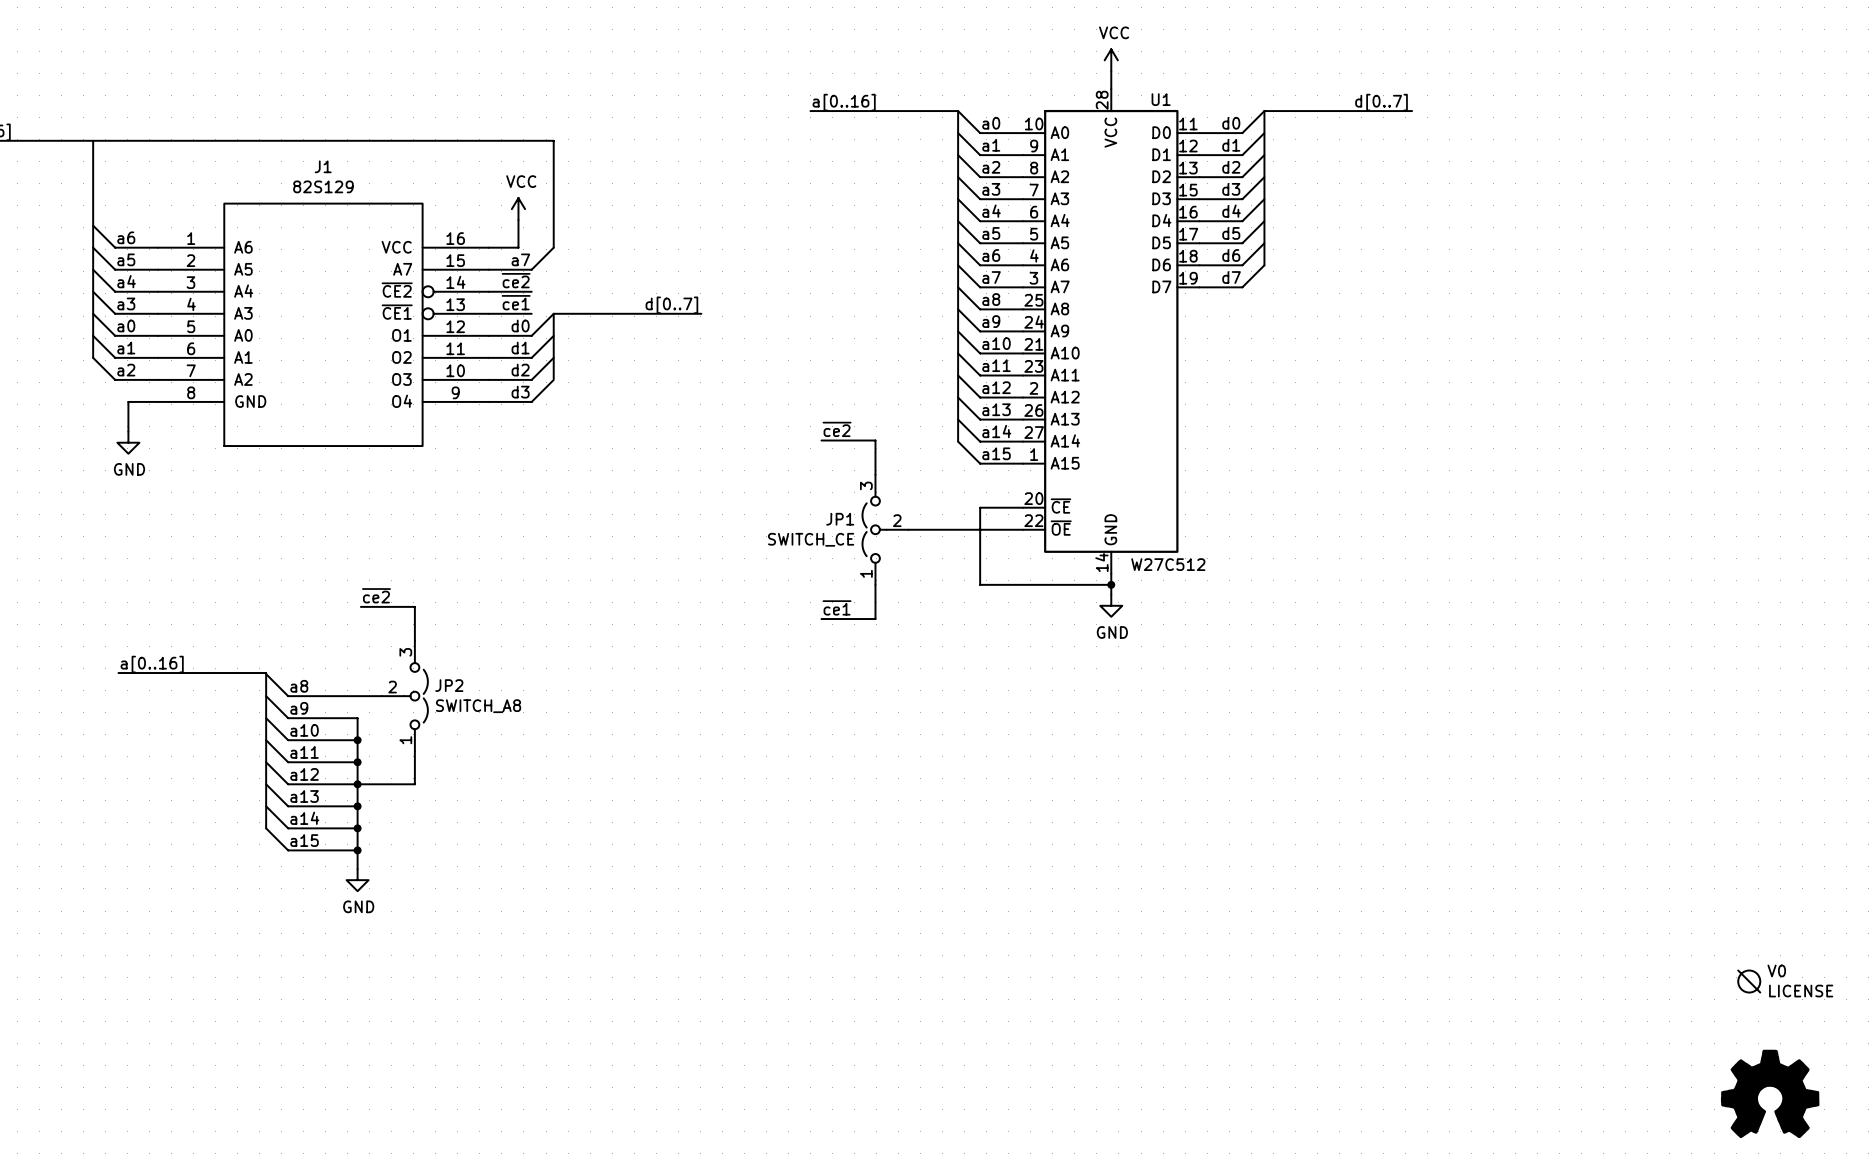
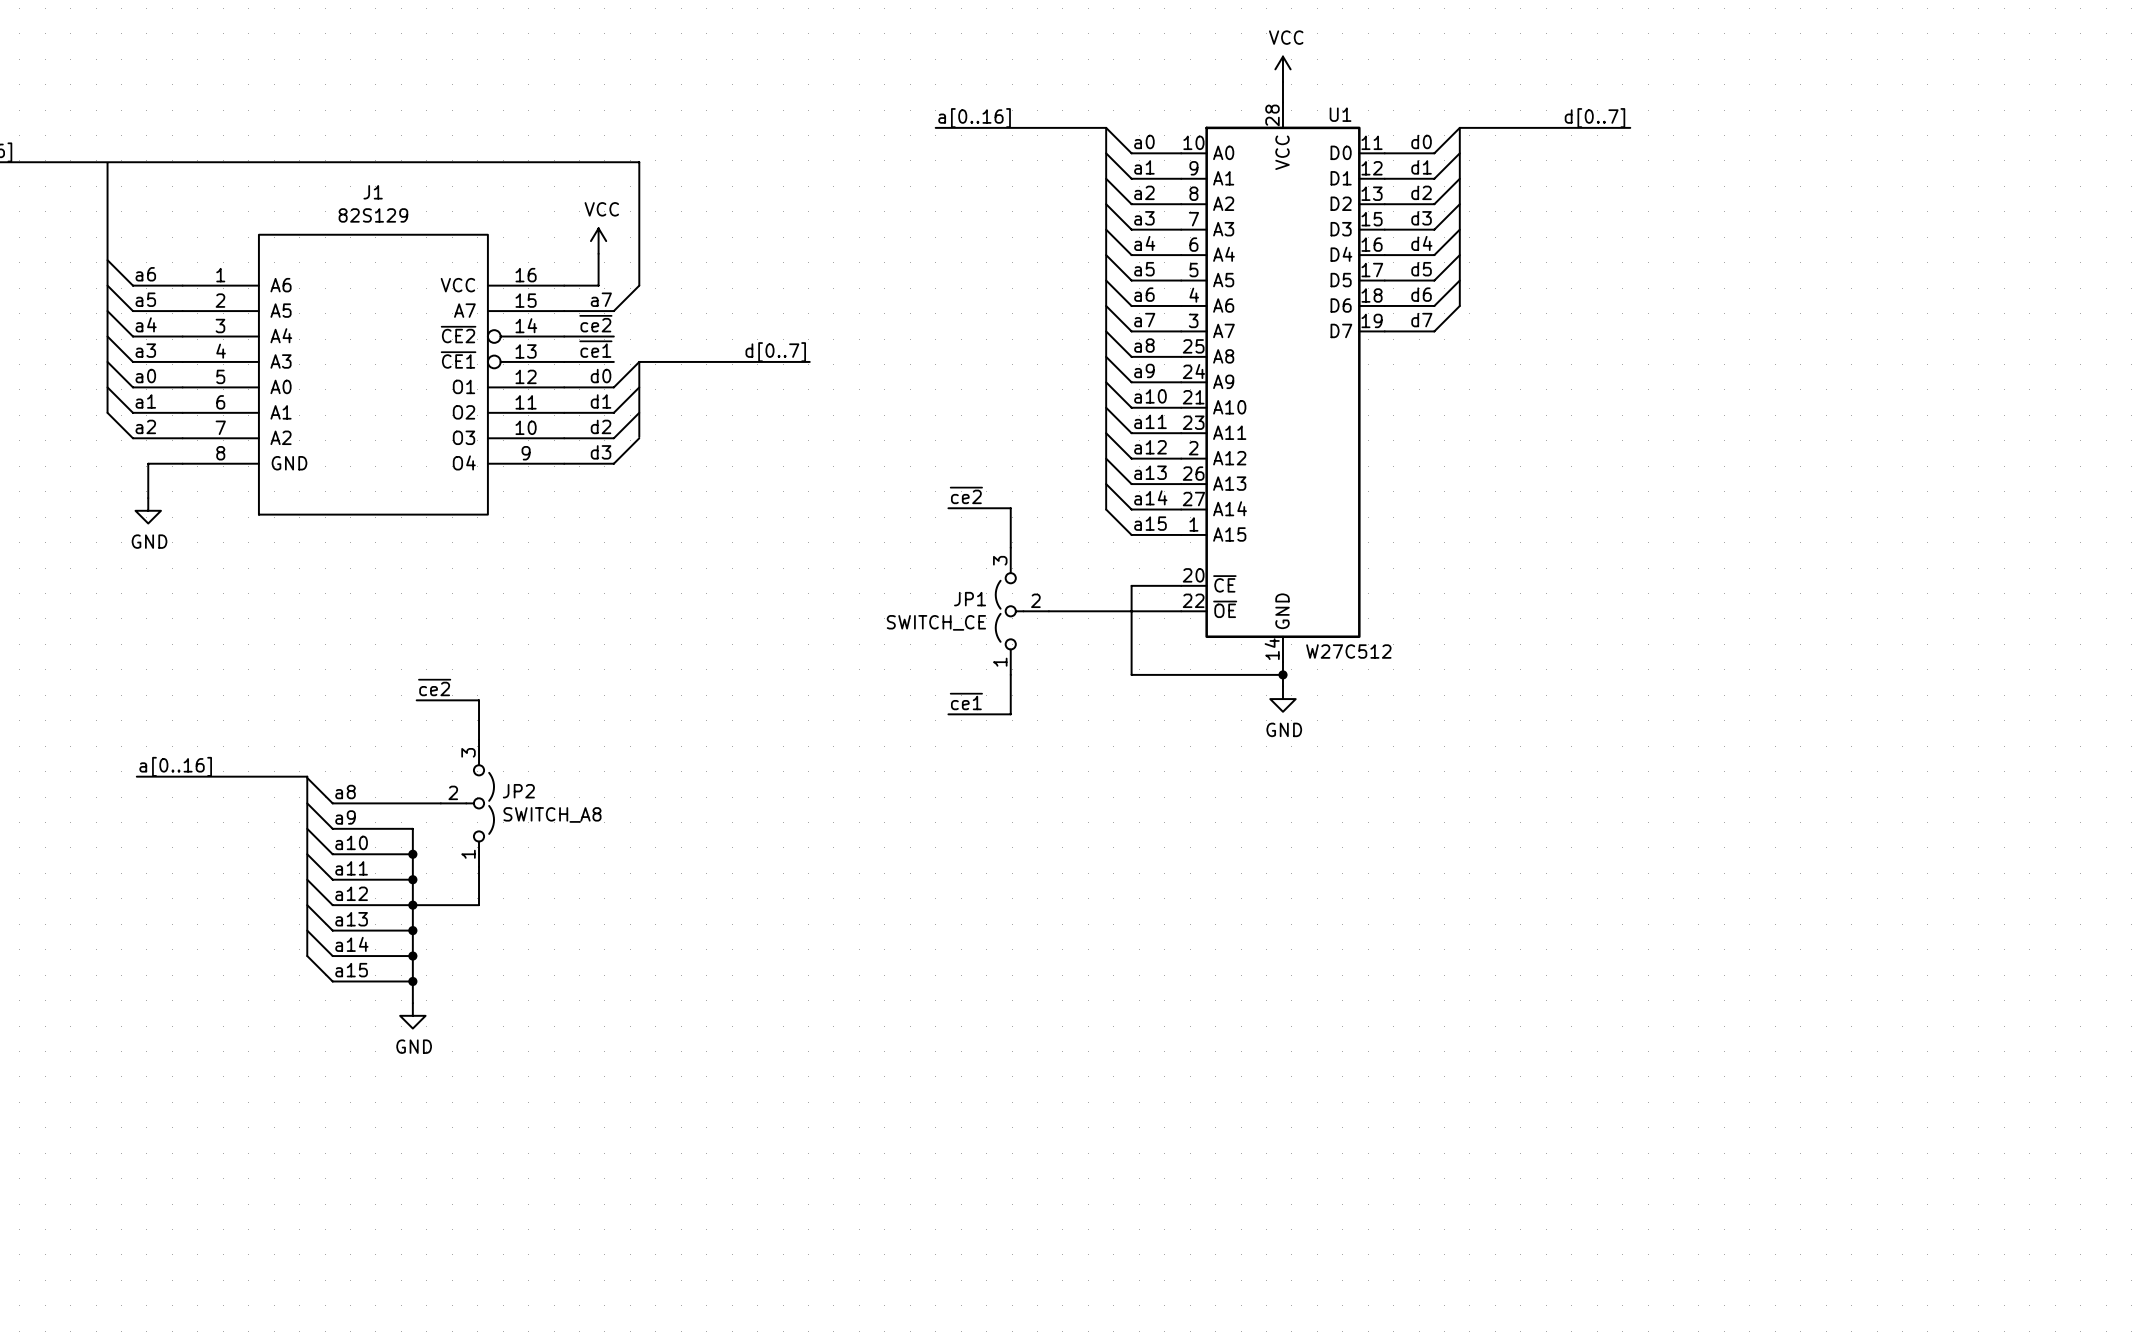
V0: LICENSE (1749, 981) -> none
power symbol: (1770, 1093) -> none

